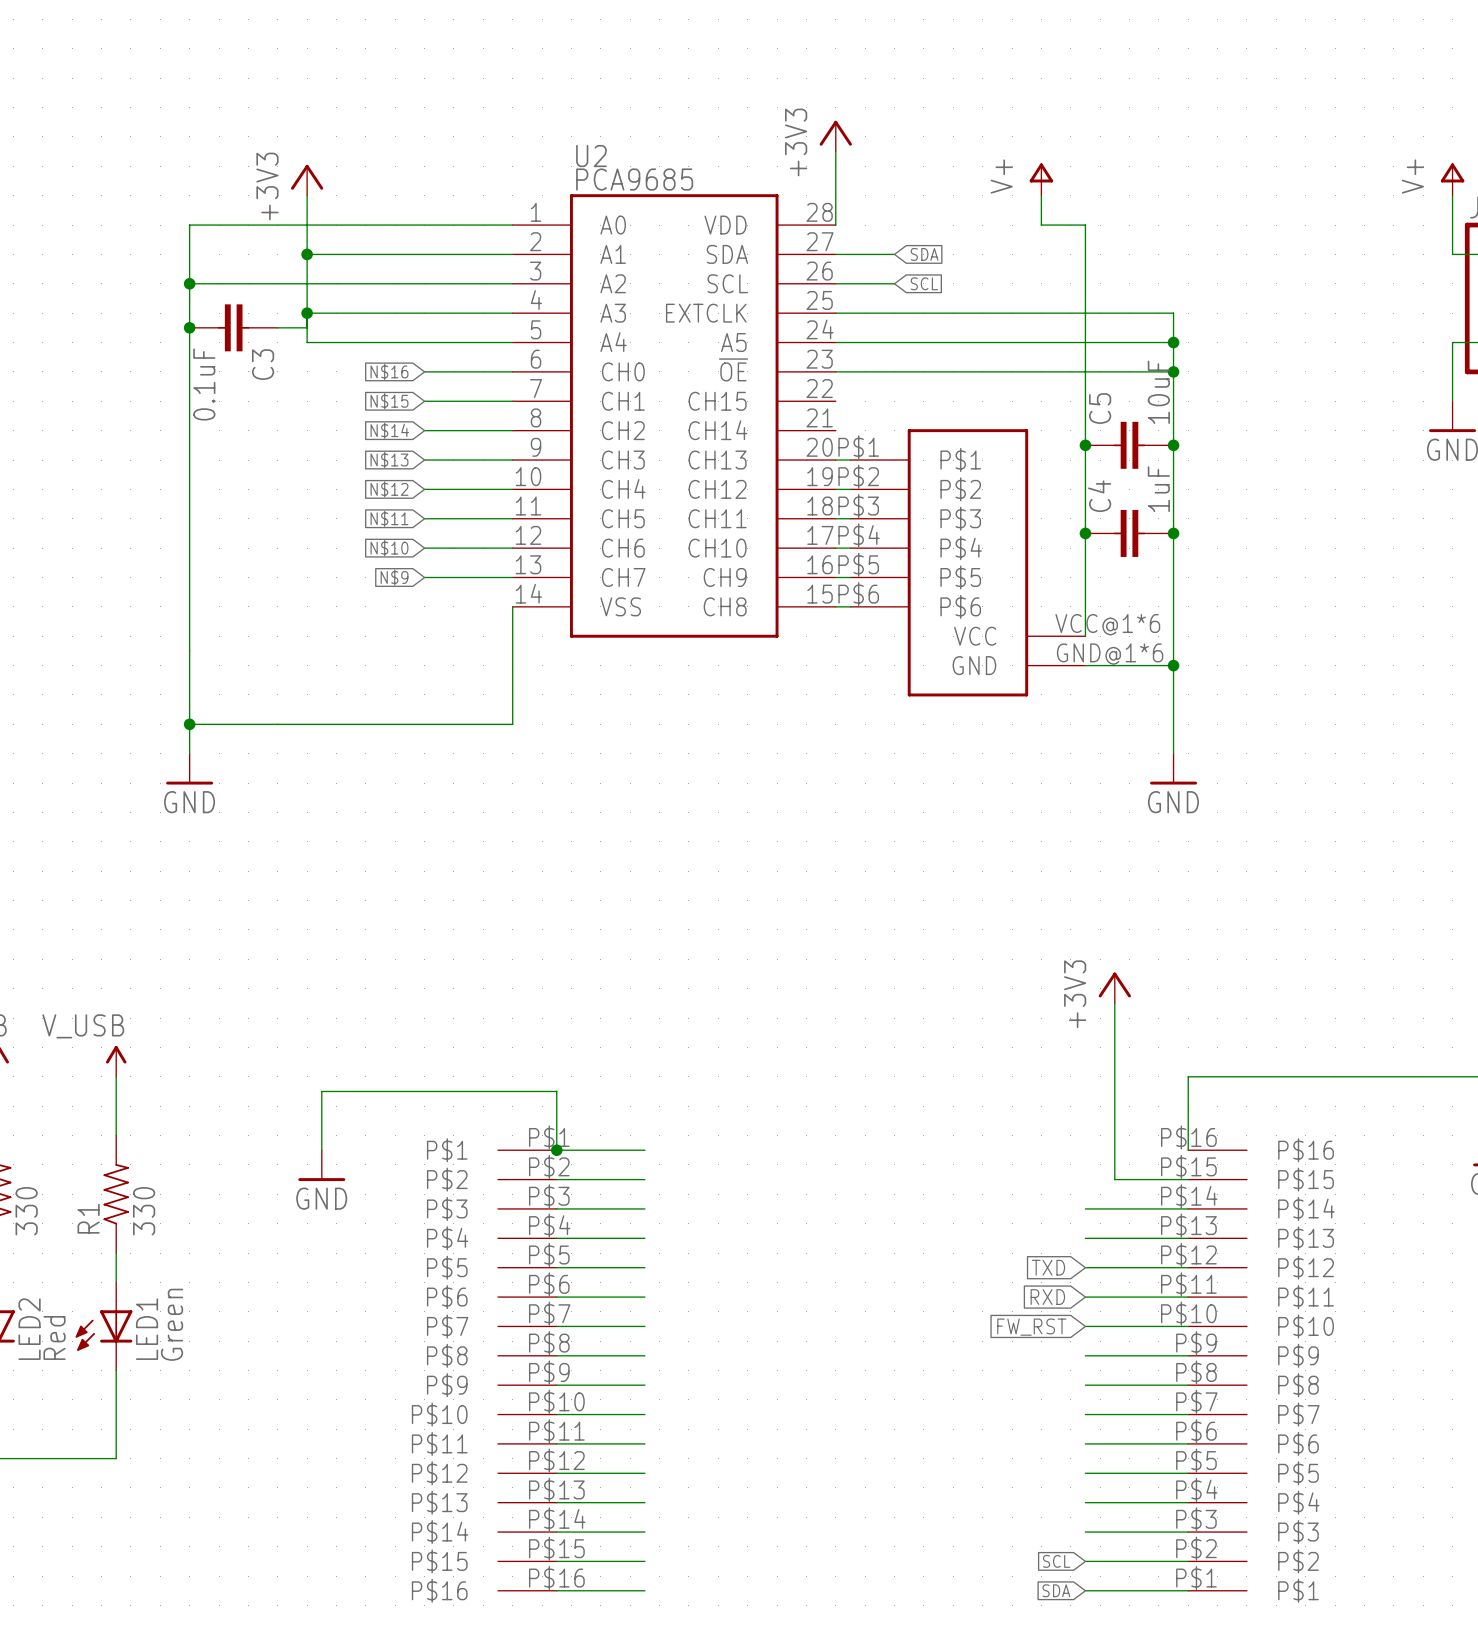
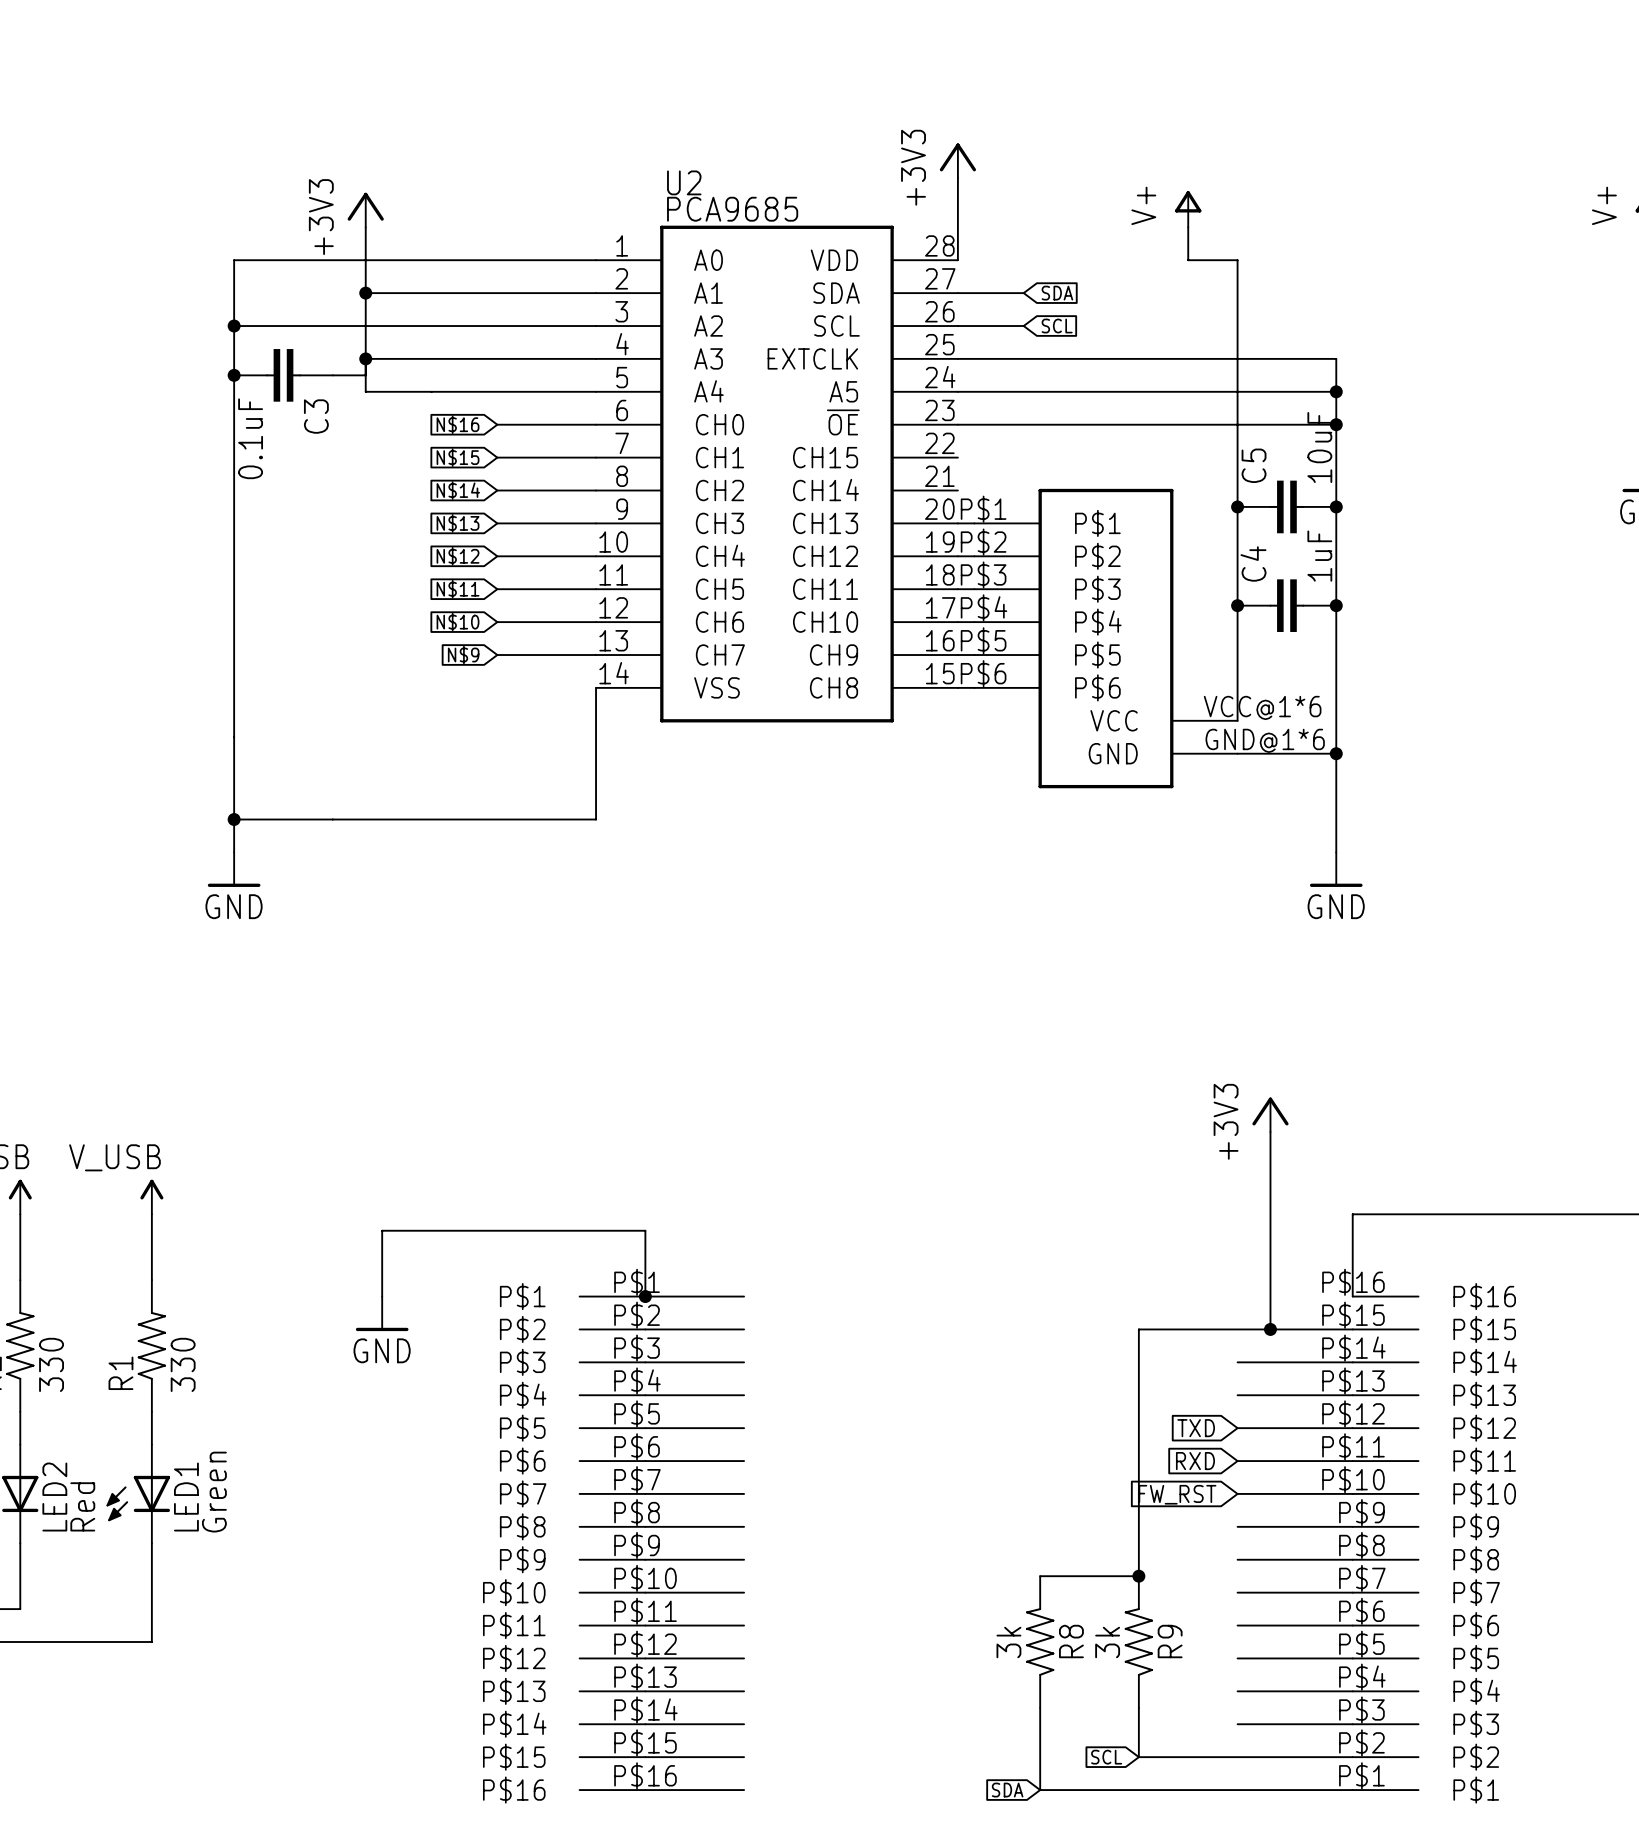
wire: none -> (1270, 1329) (1138, 1329) (1138, 1576) (1040, 1576)
junction: none -> (1270, 1329)
junction: none -> (1138, 1576)
R8: none -> 3k (1040, 1642)
R9: none -> 3k (1138, 1642)
wire: none -> (1040, 1707) (1040, 1790) (1237, 1790)
wire: none -> (1138, 1707) (1138, 1757) (1237, 1757)
global label position: SCL (1056, 1561) -> SCL (1106, 1757)
global label position: SDA (1056, 1590) -> SDA (1007, 1790)

